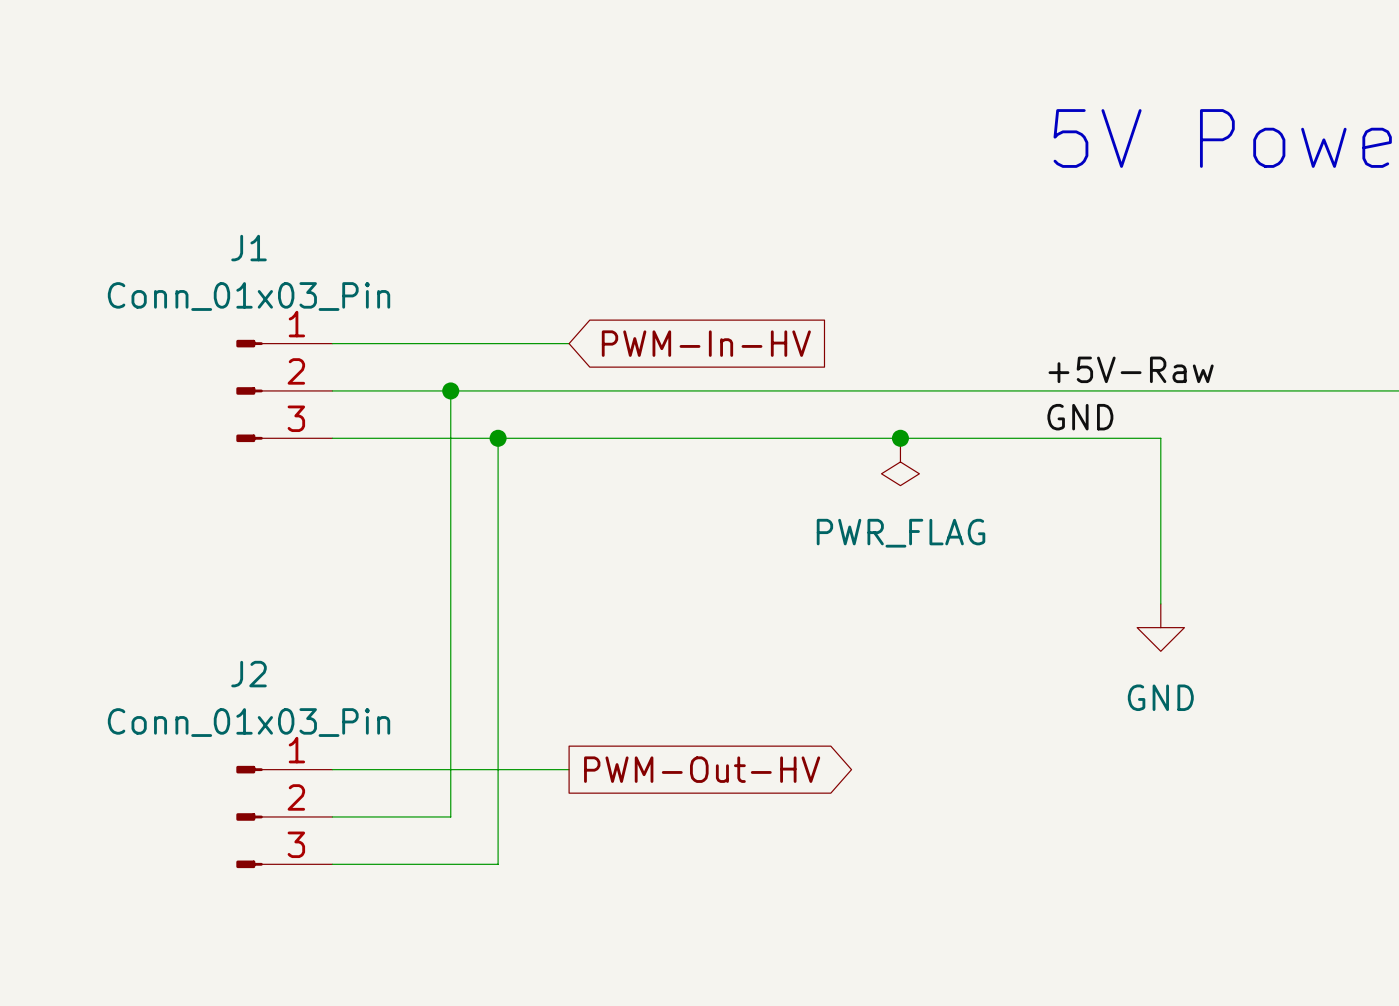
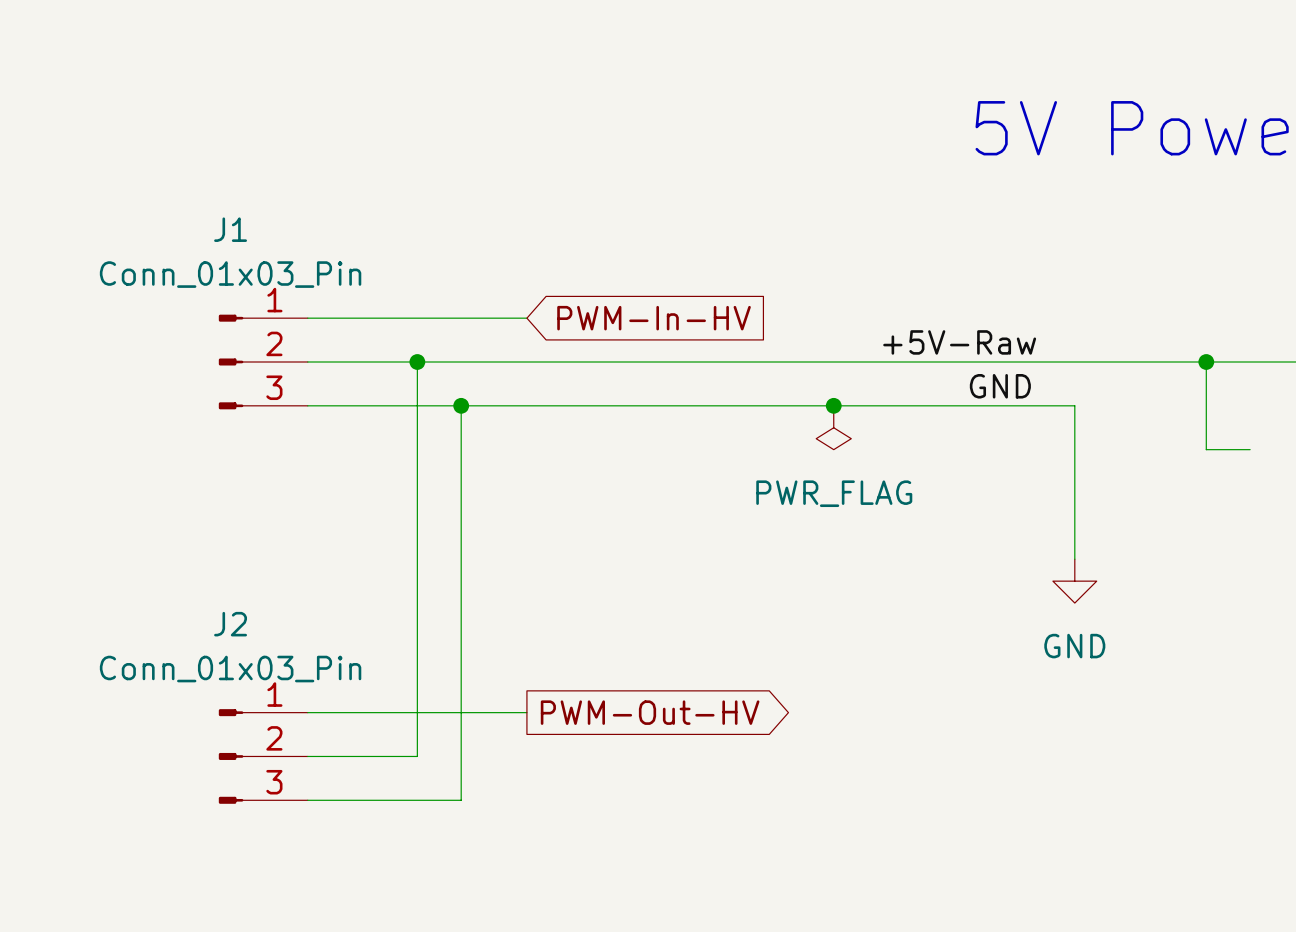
label position: +5V-Raw (1131, 369) -> +5V-Raw (959, 342)
wire: none -> (1206, 362) (1206, 449) (1250, 449)
junction: none -> (1206, 362)

